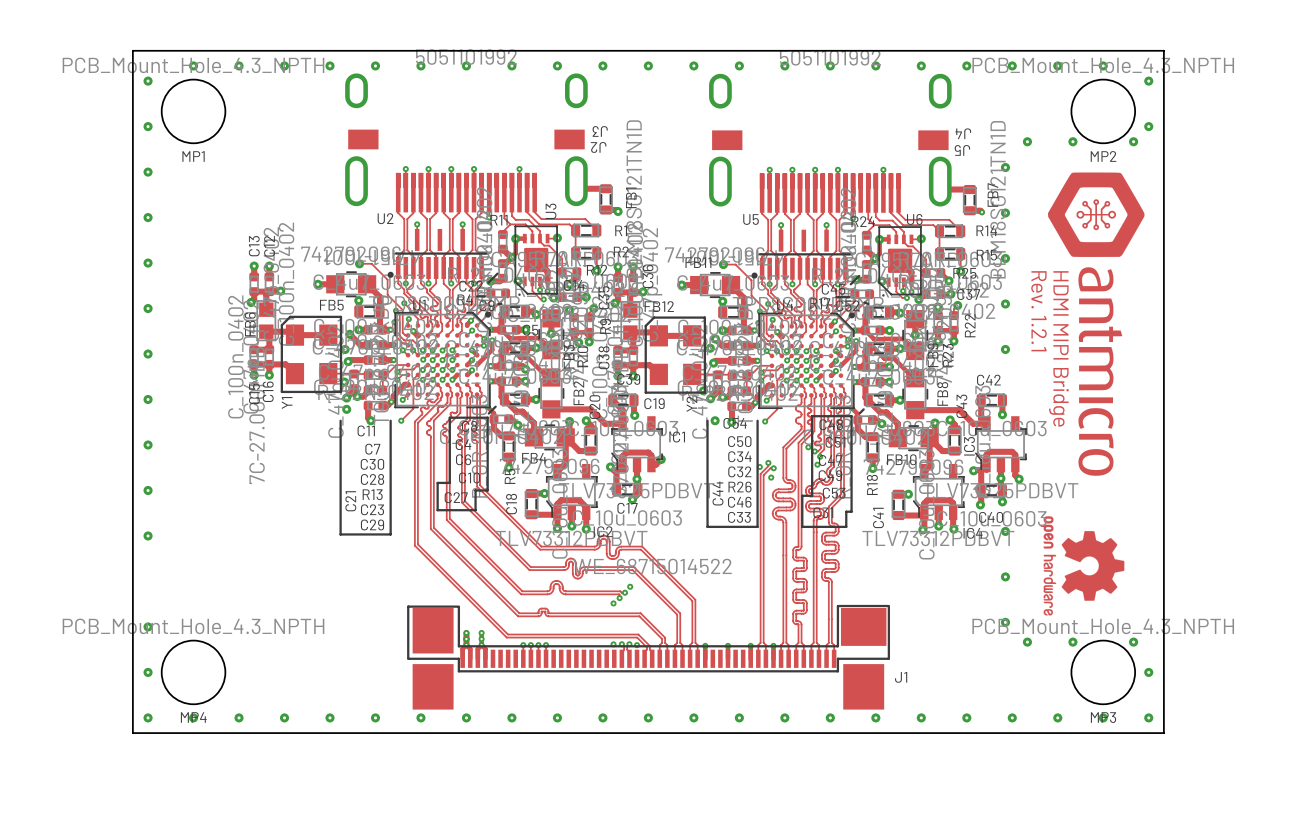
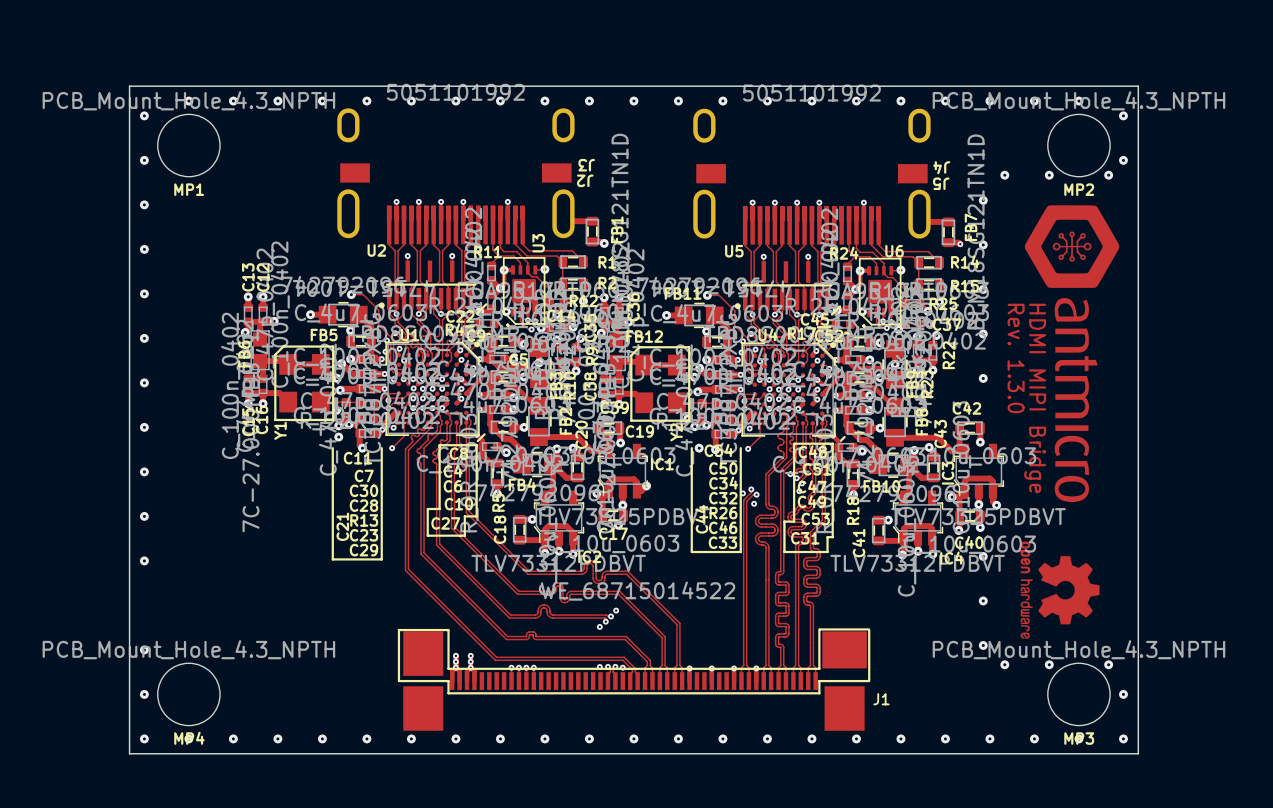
text: Rev. 1.2.1 (1039, 311) -> Rev. 1.3.0 (1016, 358)

